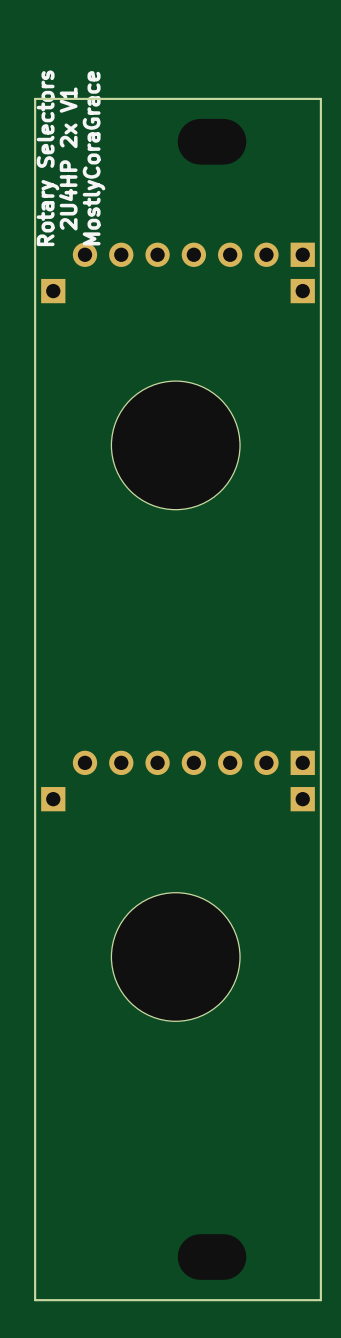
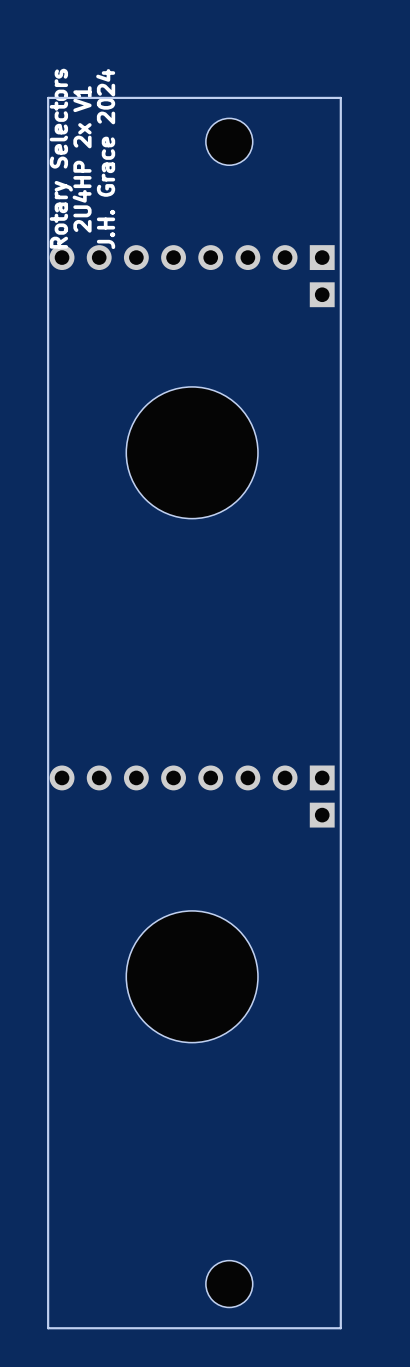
part footprint: [177, 118, 247, 165] -> [205, 118, 253, 166]
text: MostlyCoraGrace (94, 158) -> J.H. Grace 2024 (105, 159)
part: none -> (192, 257)
part: (193, 254) -> none
part: (53, 291) -> none
part: none -> (192, 777)
part: (53, 799) -> none
part footprint: [177, 1234, 247, 1280] -> [205, 1260, 253, 1308]

